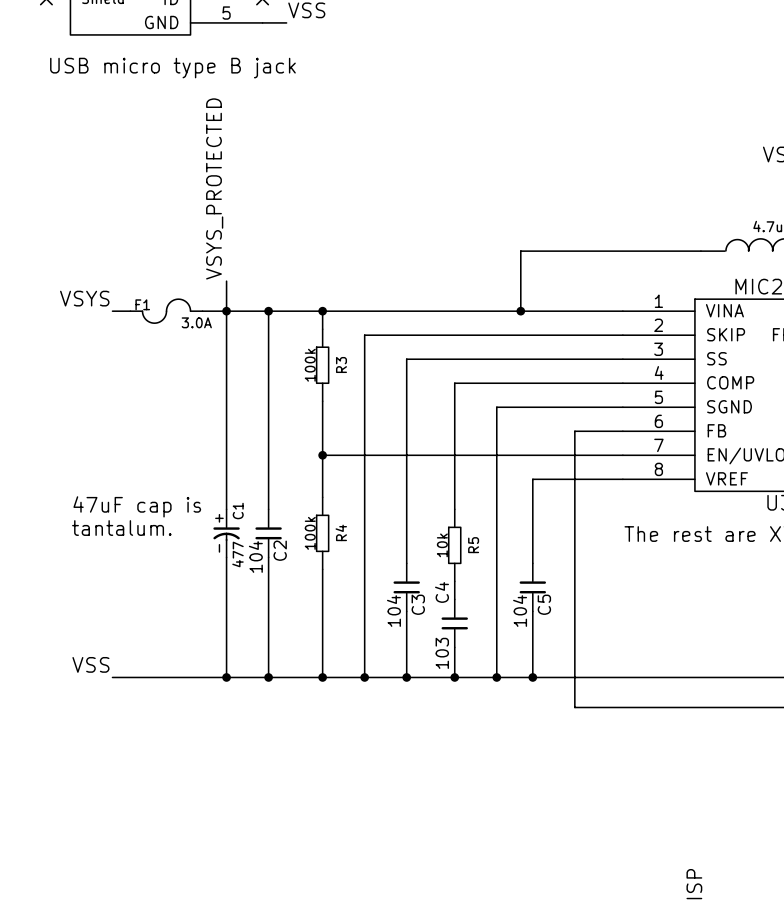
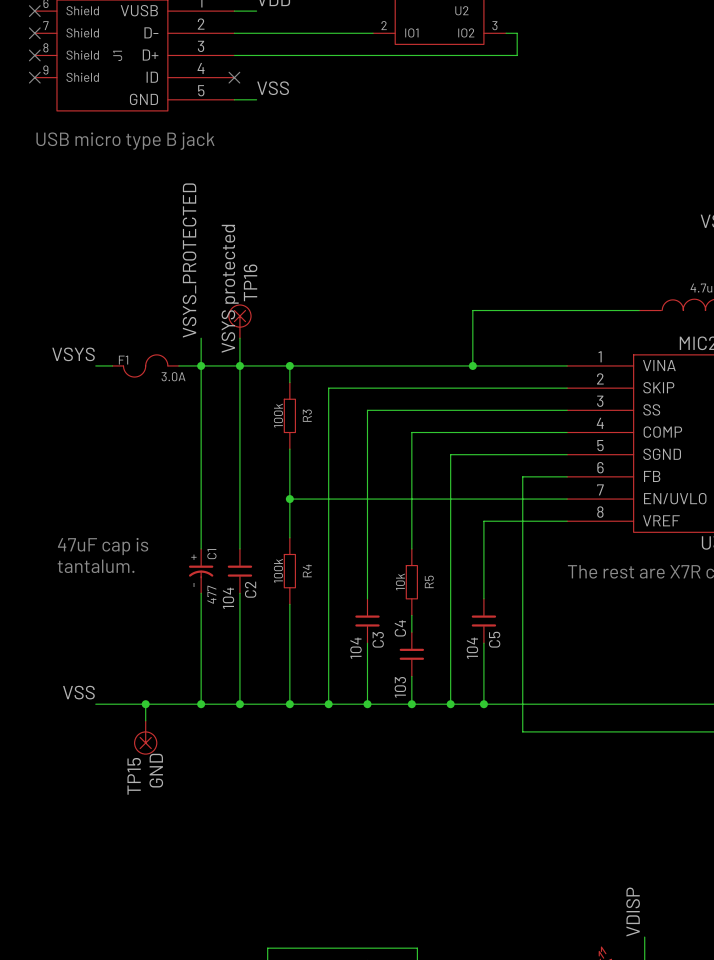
TP16: none -> VSYS protected (239, 321)
wire: none -> (239, 338) (239, 365)
wire: none -> (145, 704) (145, 720)
junction: none -> (145, 704)
TP15: none -> GND (145, 737)

